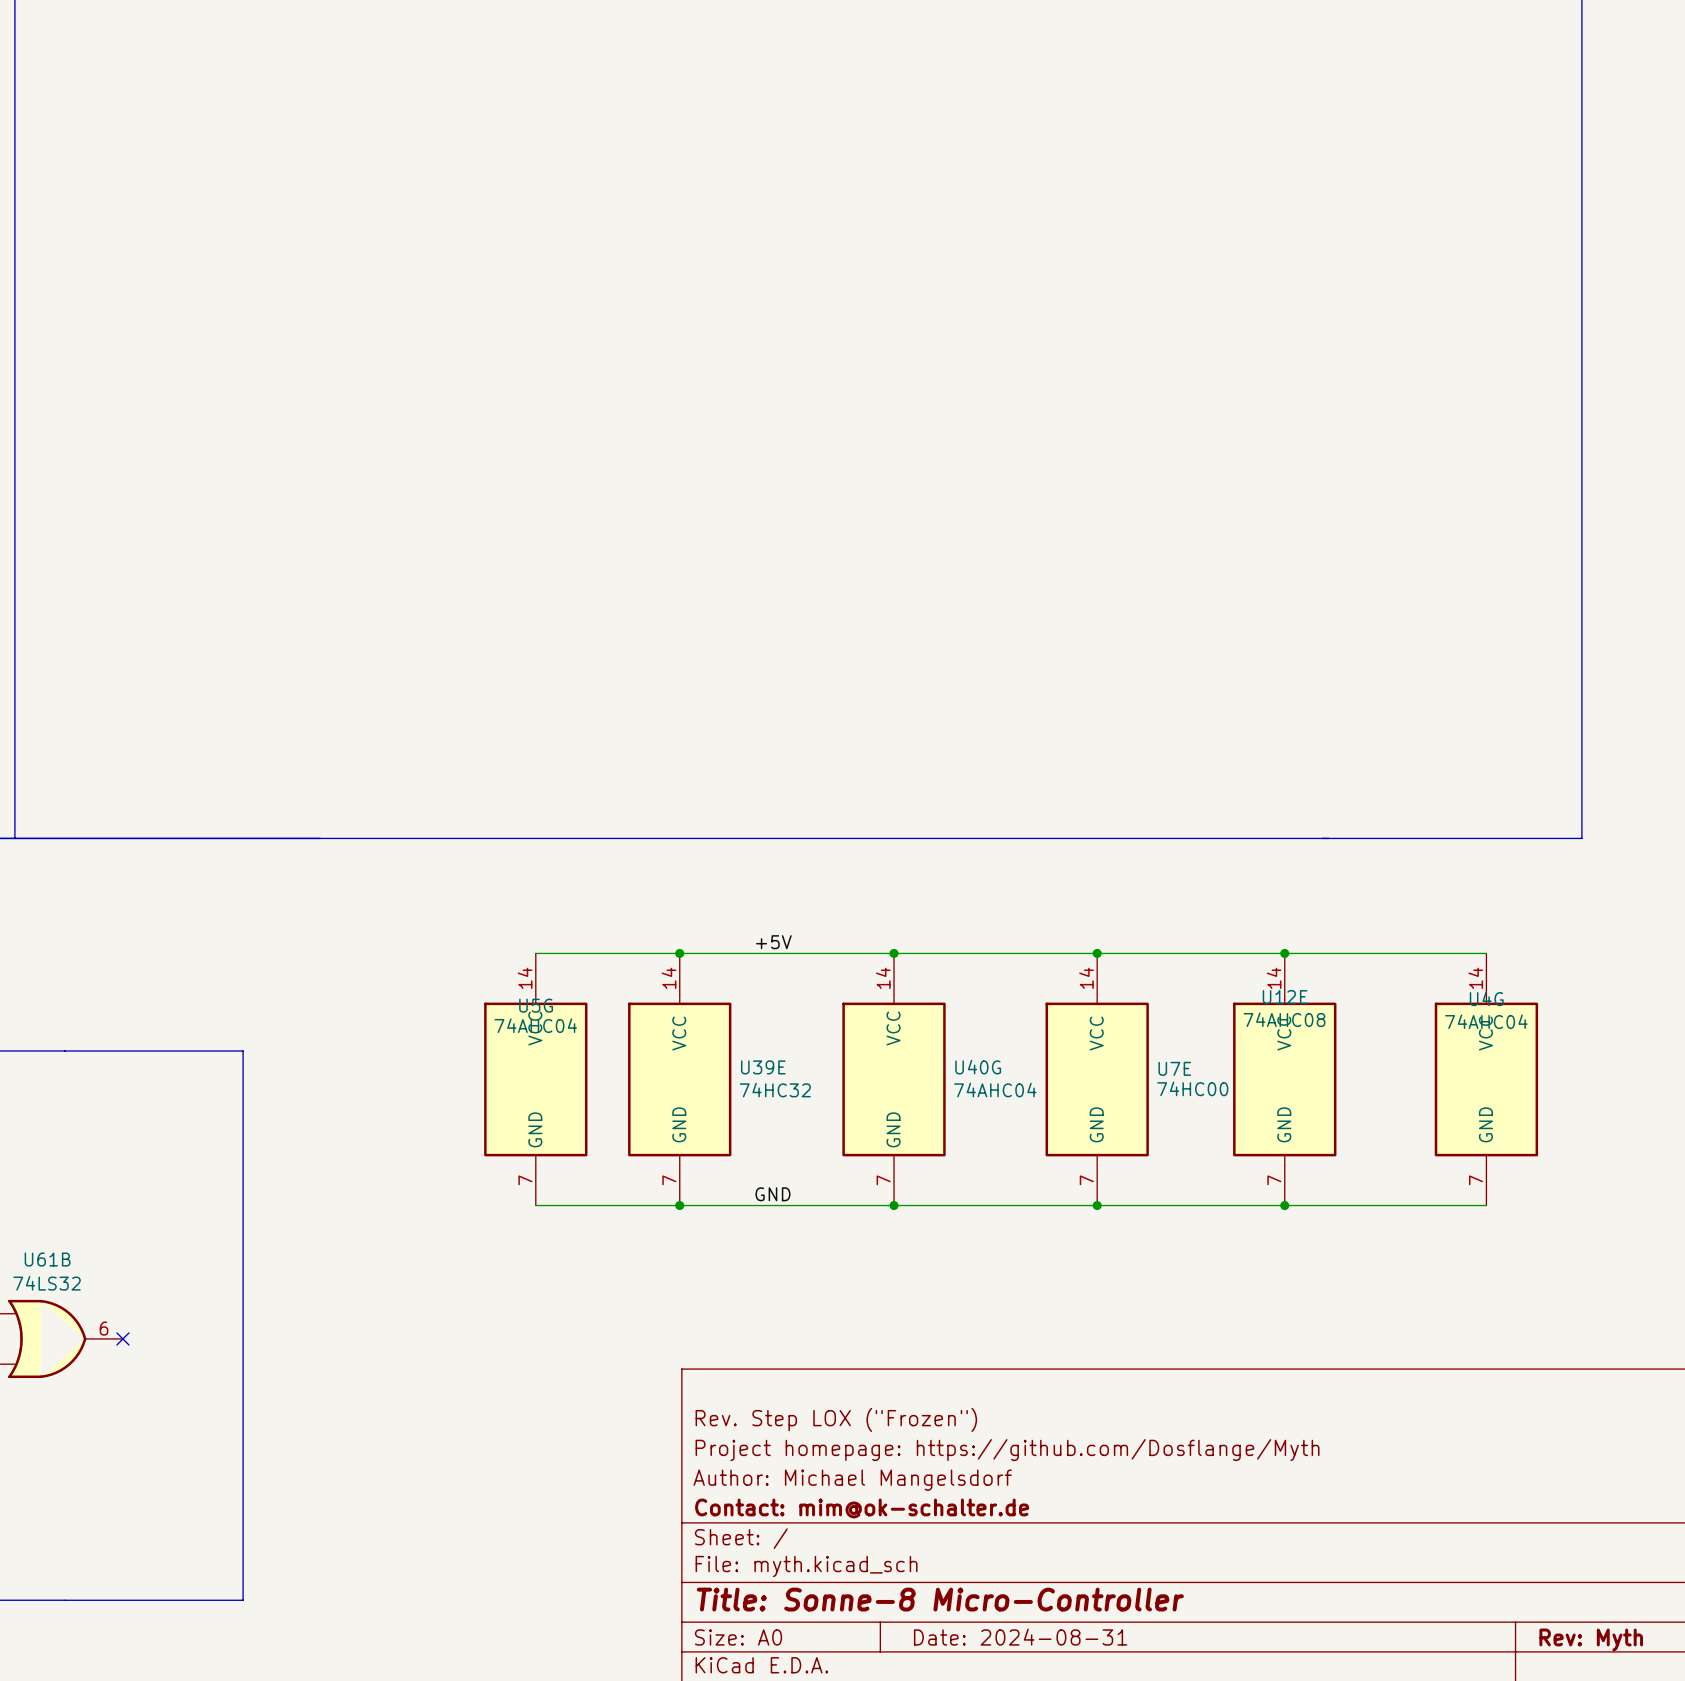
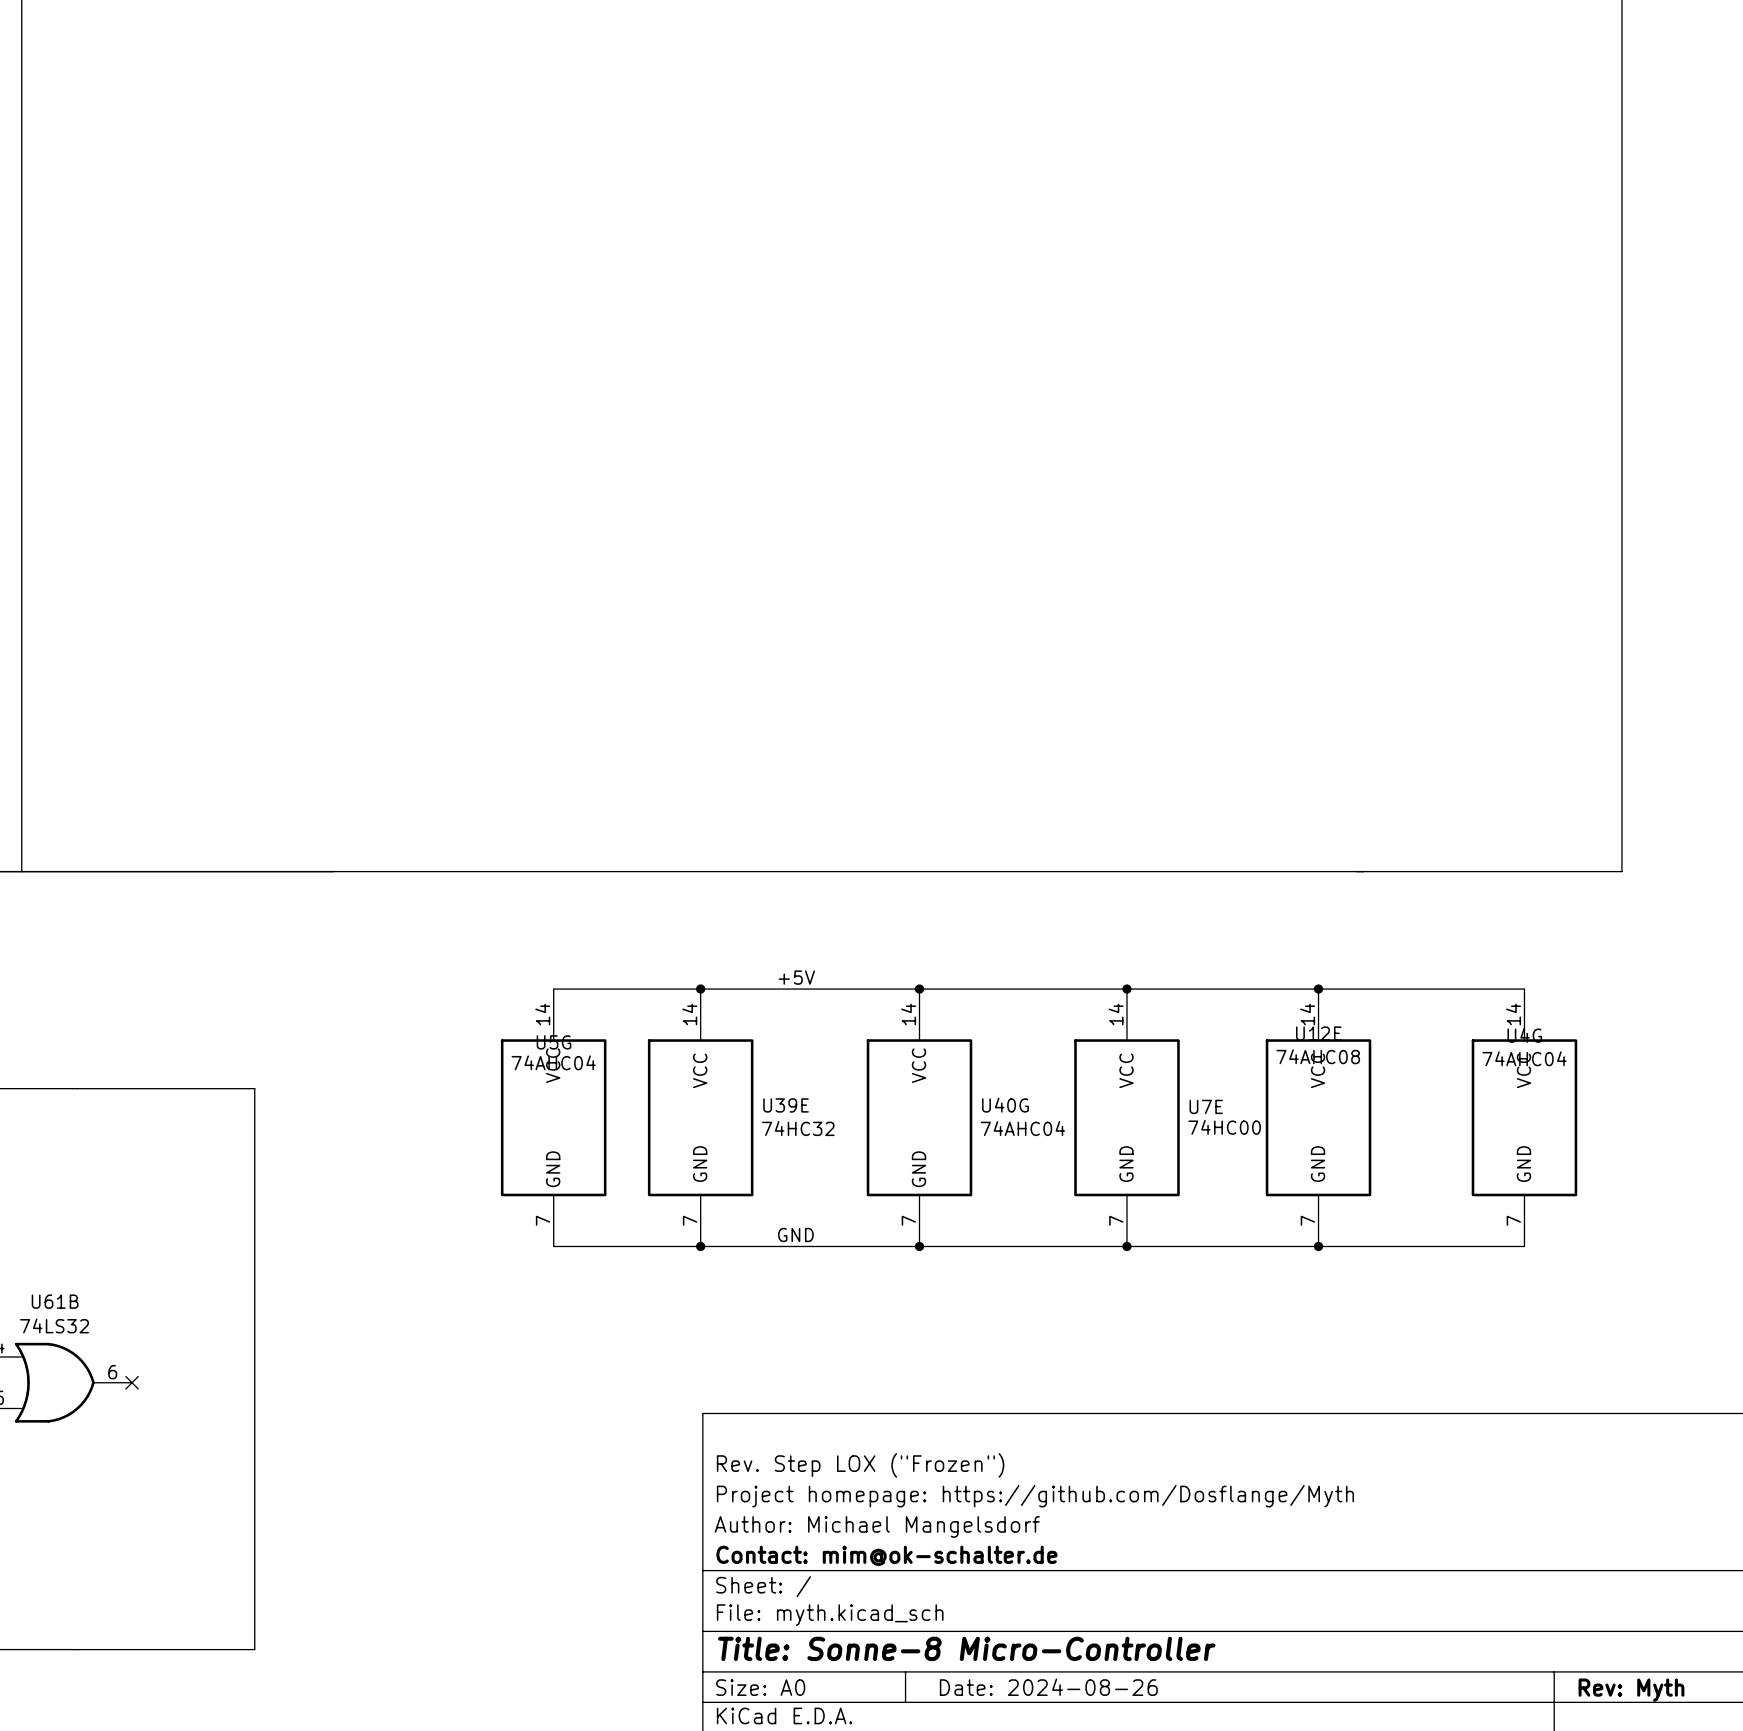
title block: Date: 2024-08-31 (1020, 1637) -> Date: 2024-08-26 (1048, 1687)

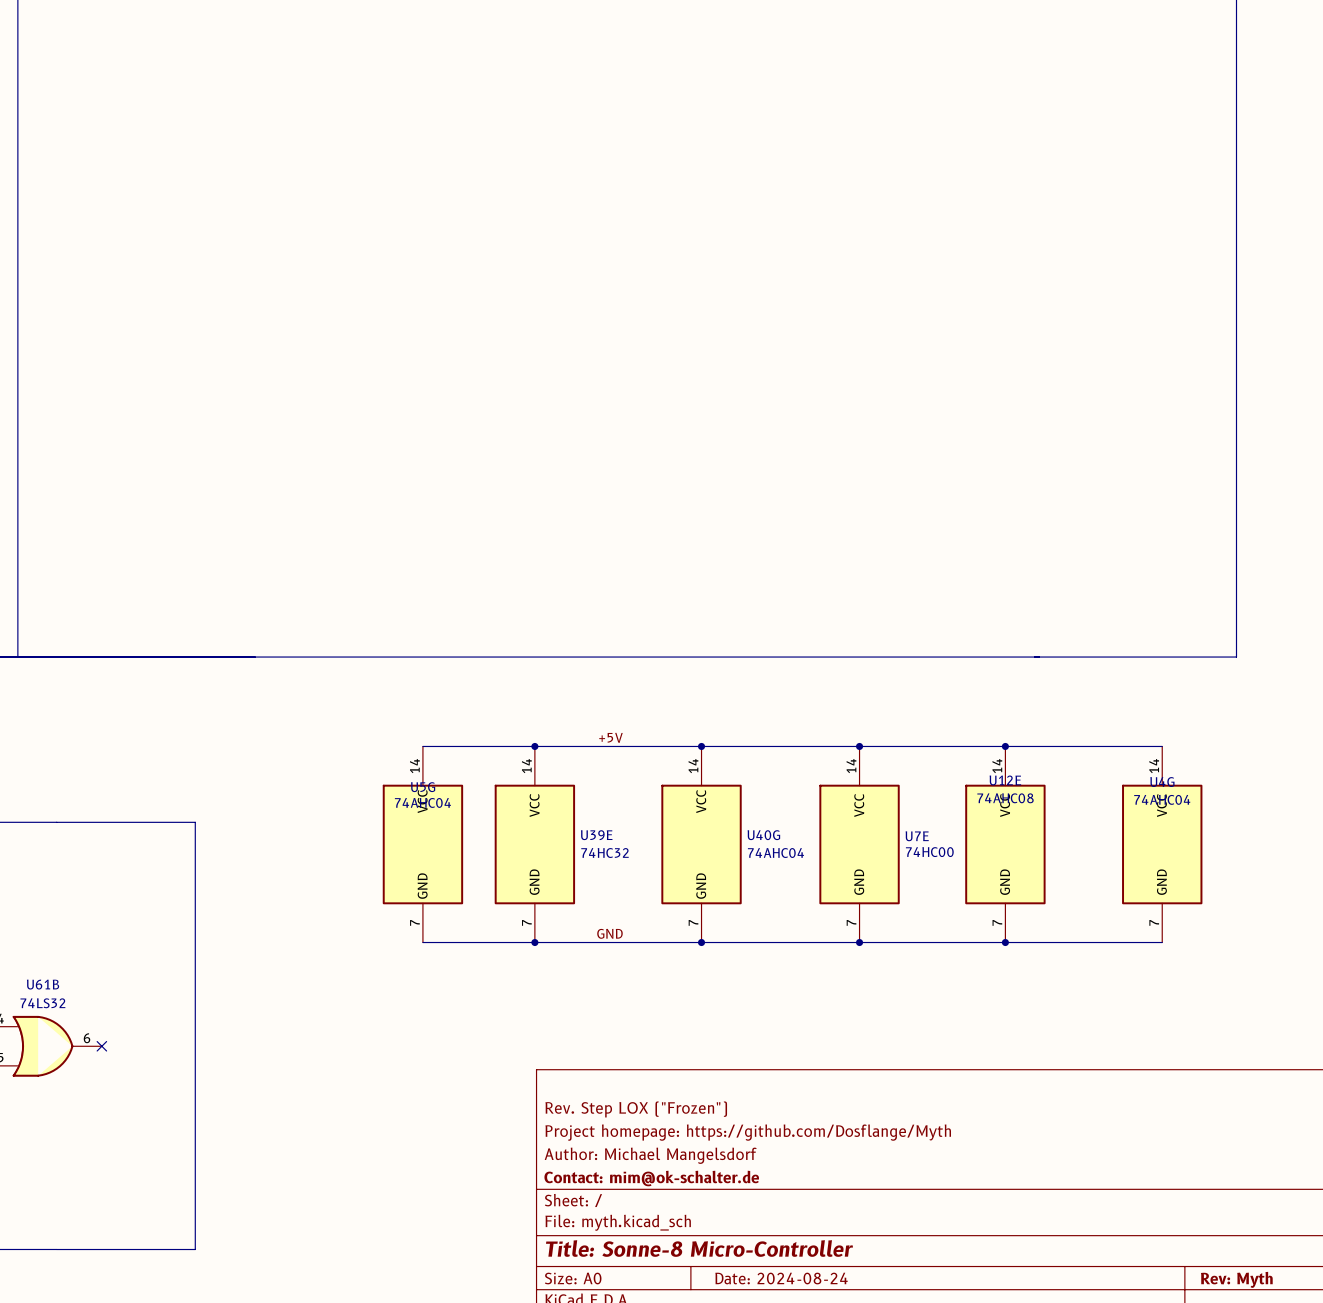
title block: Date: 2024-08-26 (1048, 1687) -> Date: 2024-08-24 (781, 1278)

